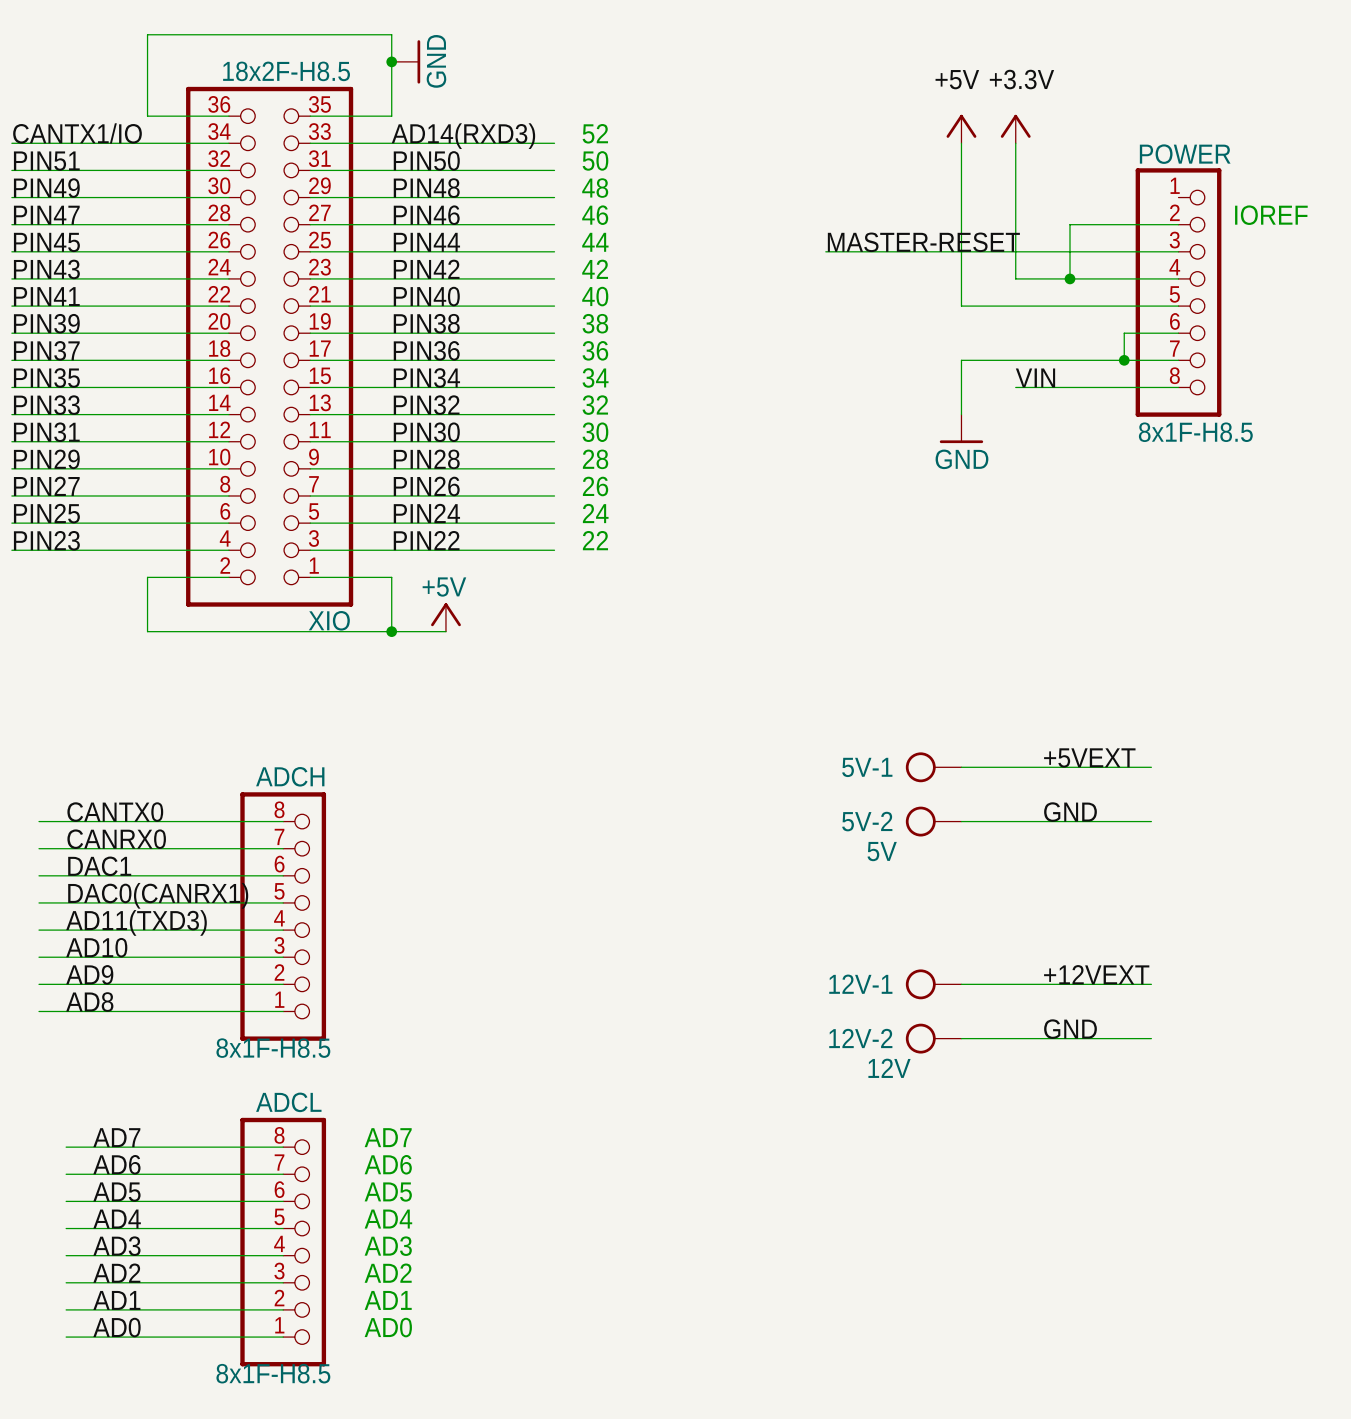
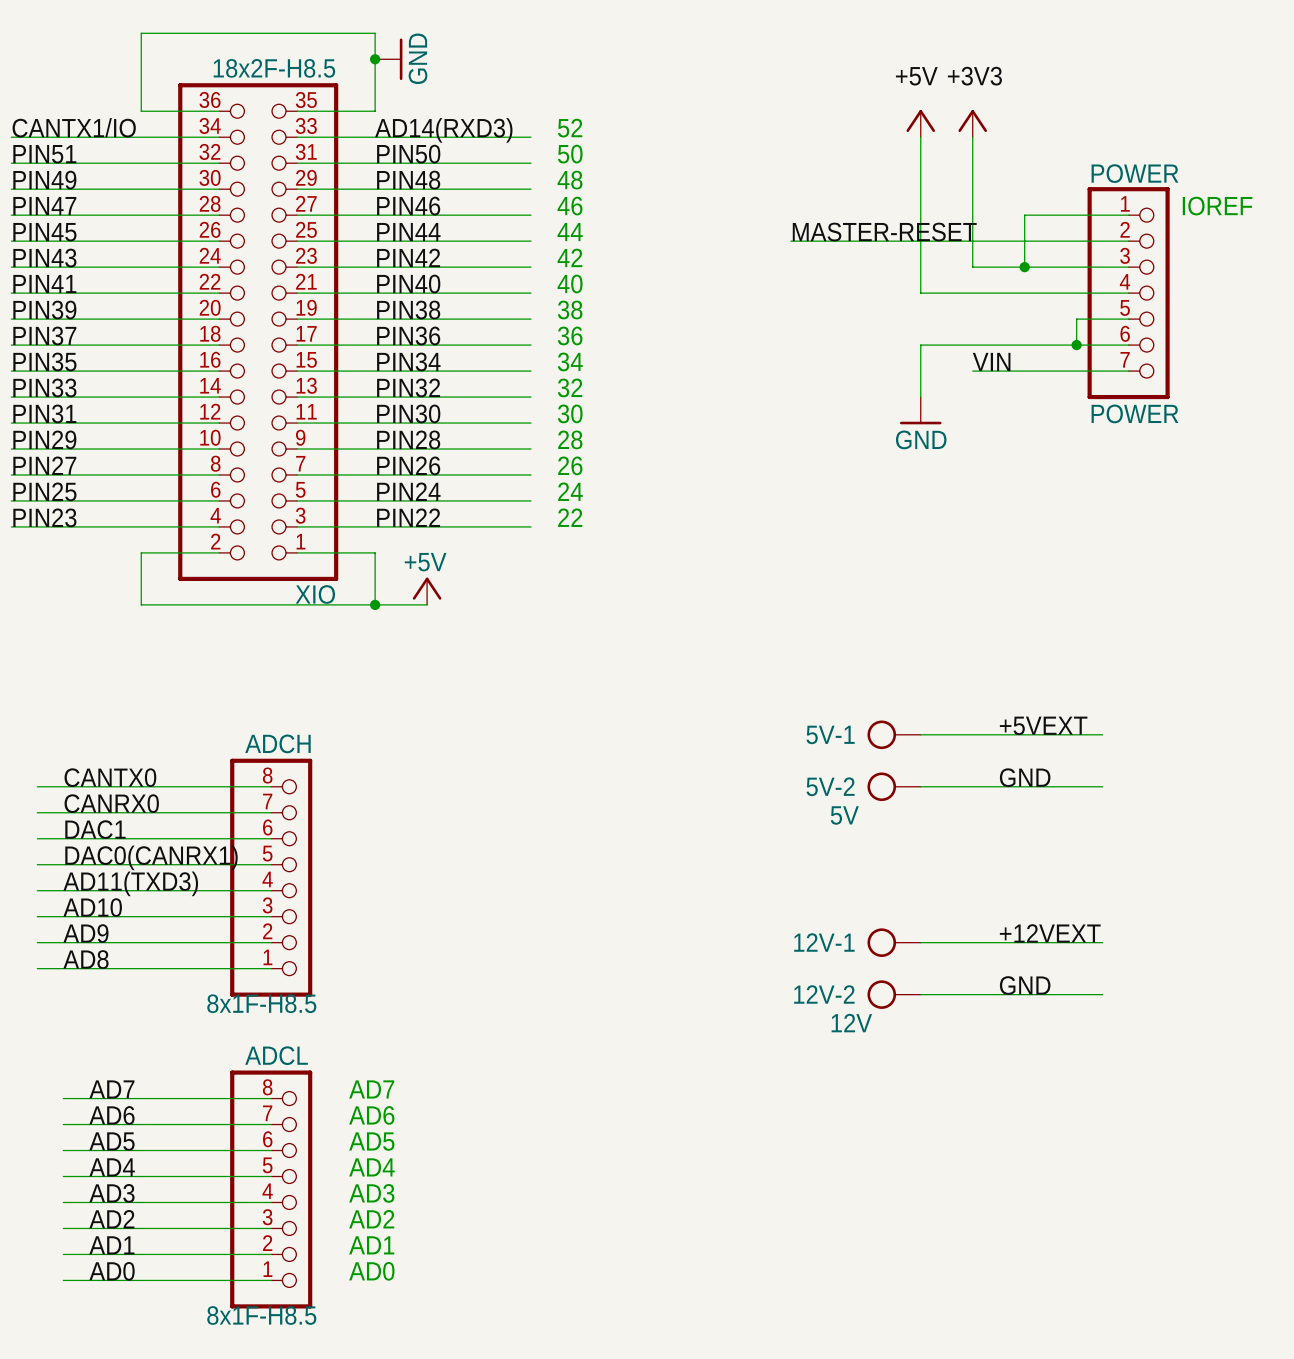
label: +3.3V (1021, 79) -> +3V3 (974, 76)
POWER: 8x1F-H8.5 (1178, 292) -> none
POWER: none -> POWER (1128, 293)

